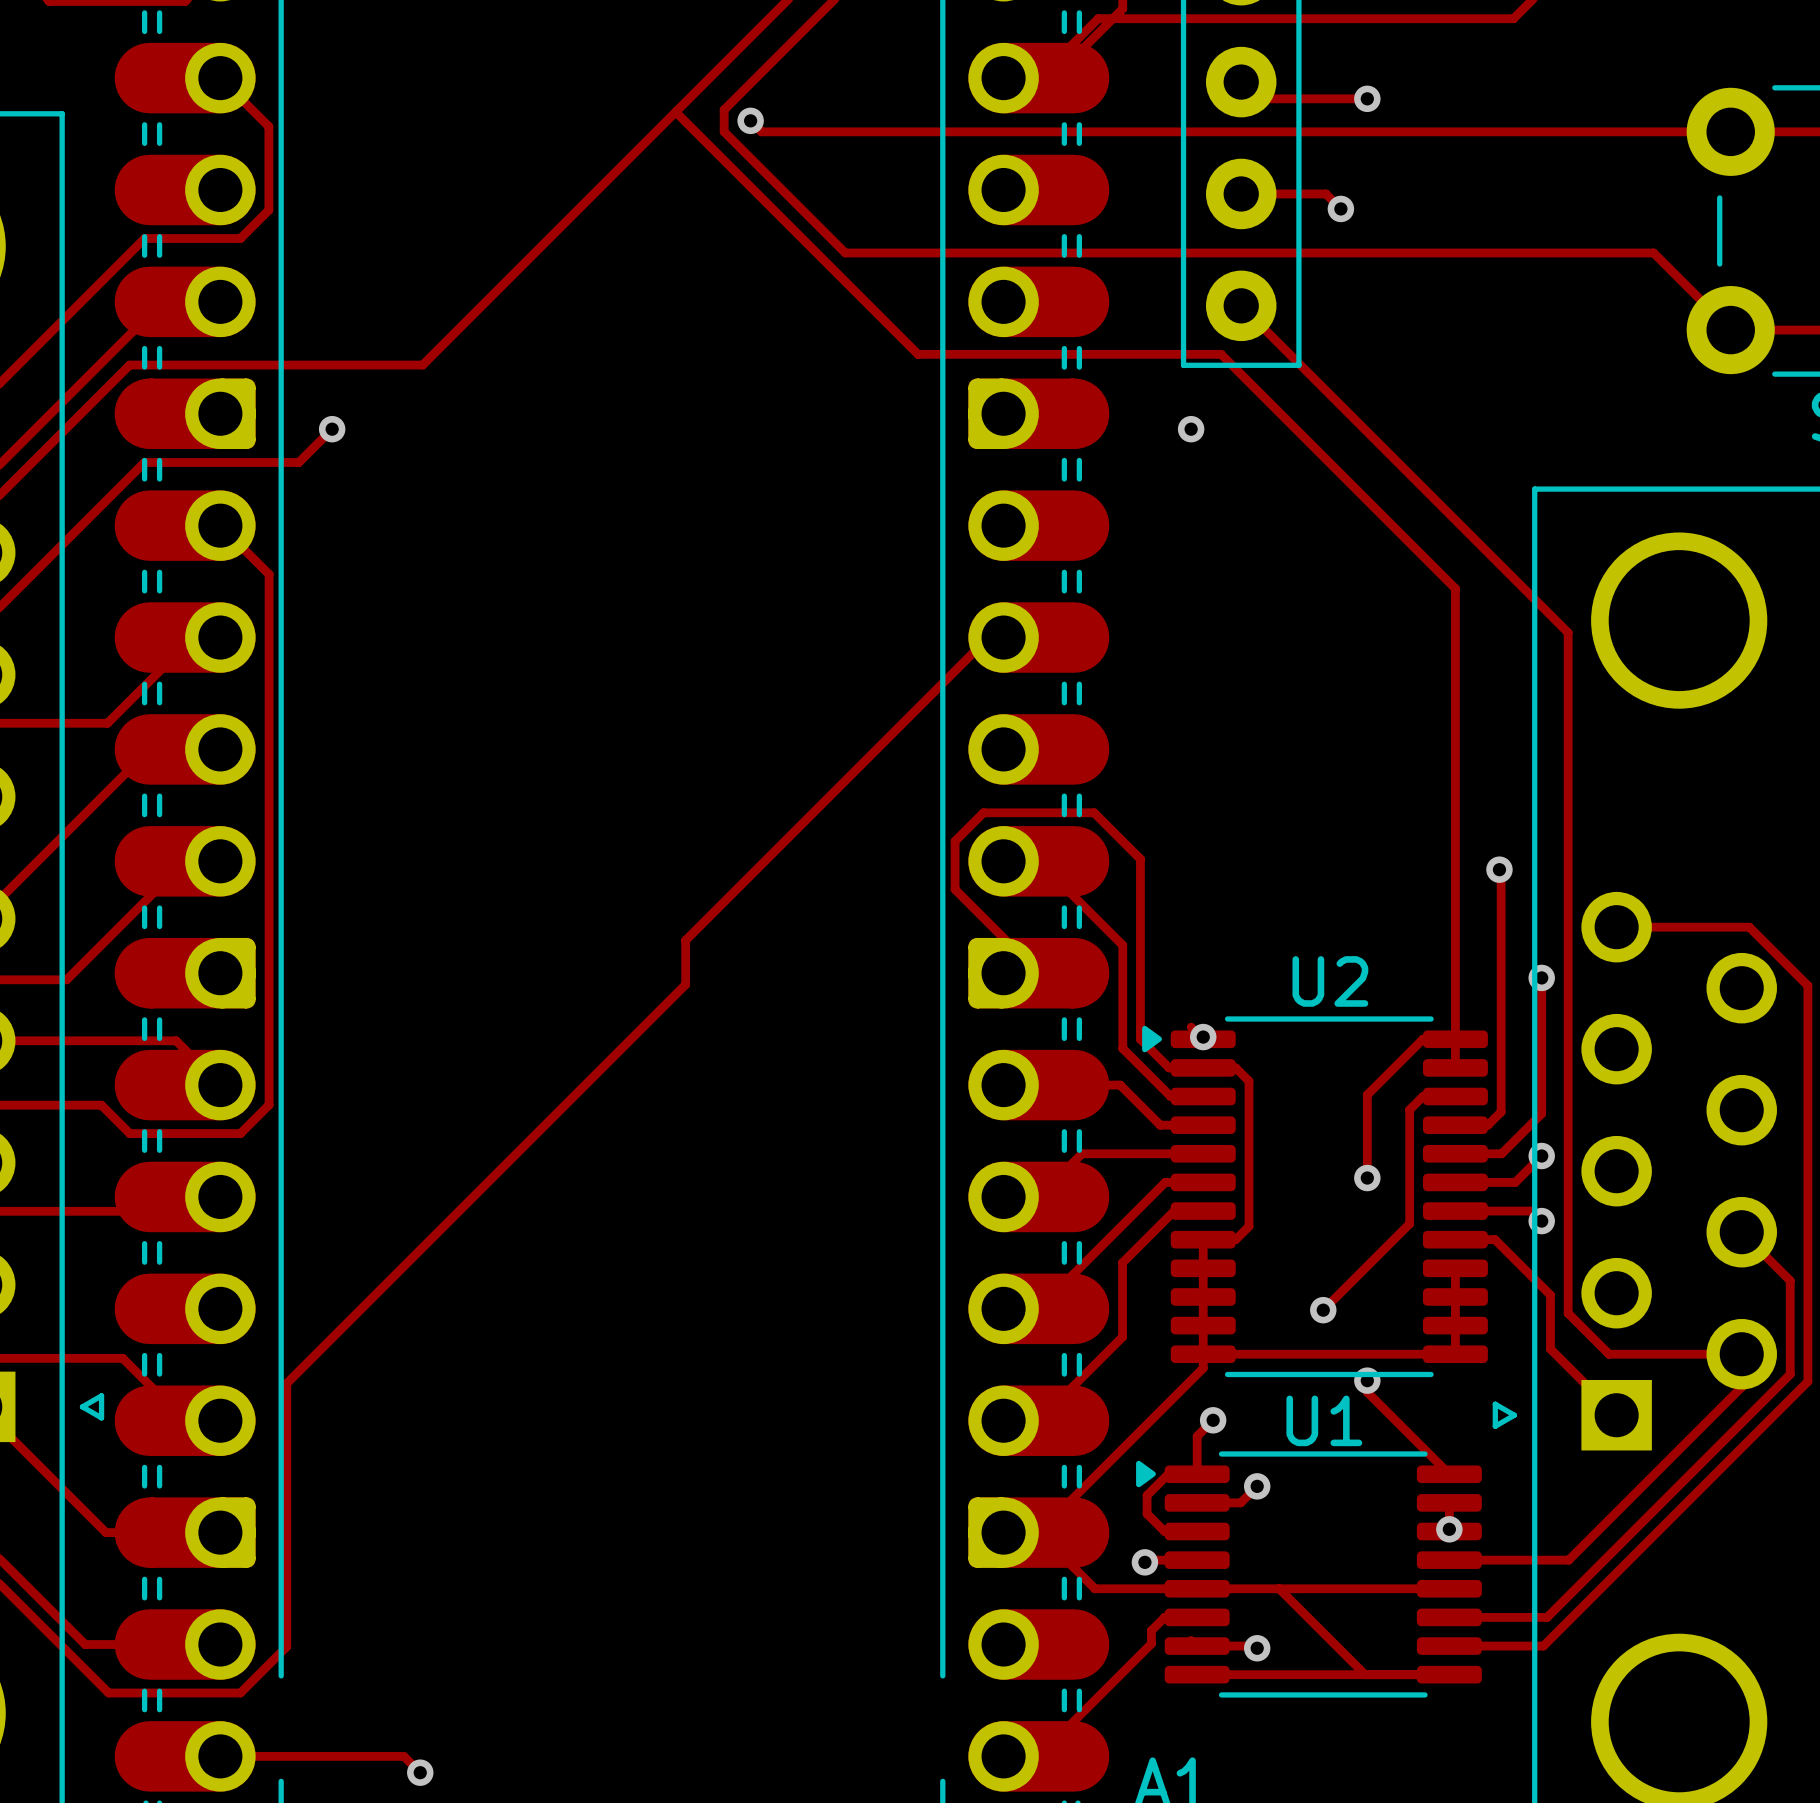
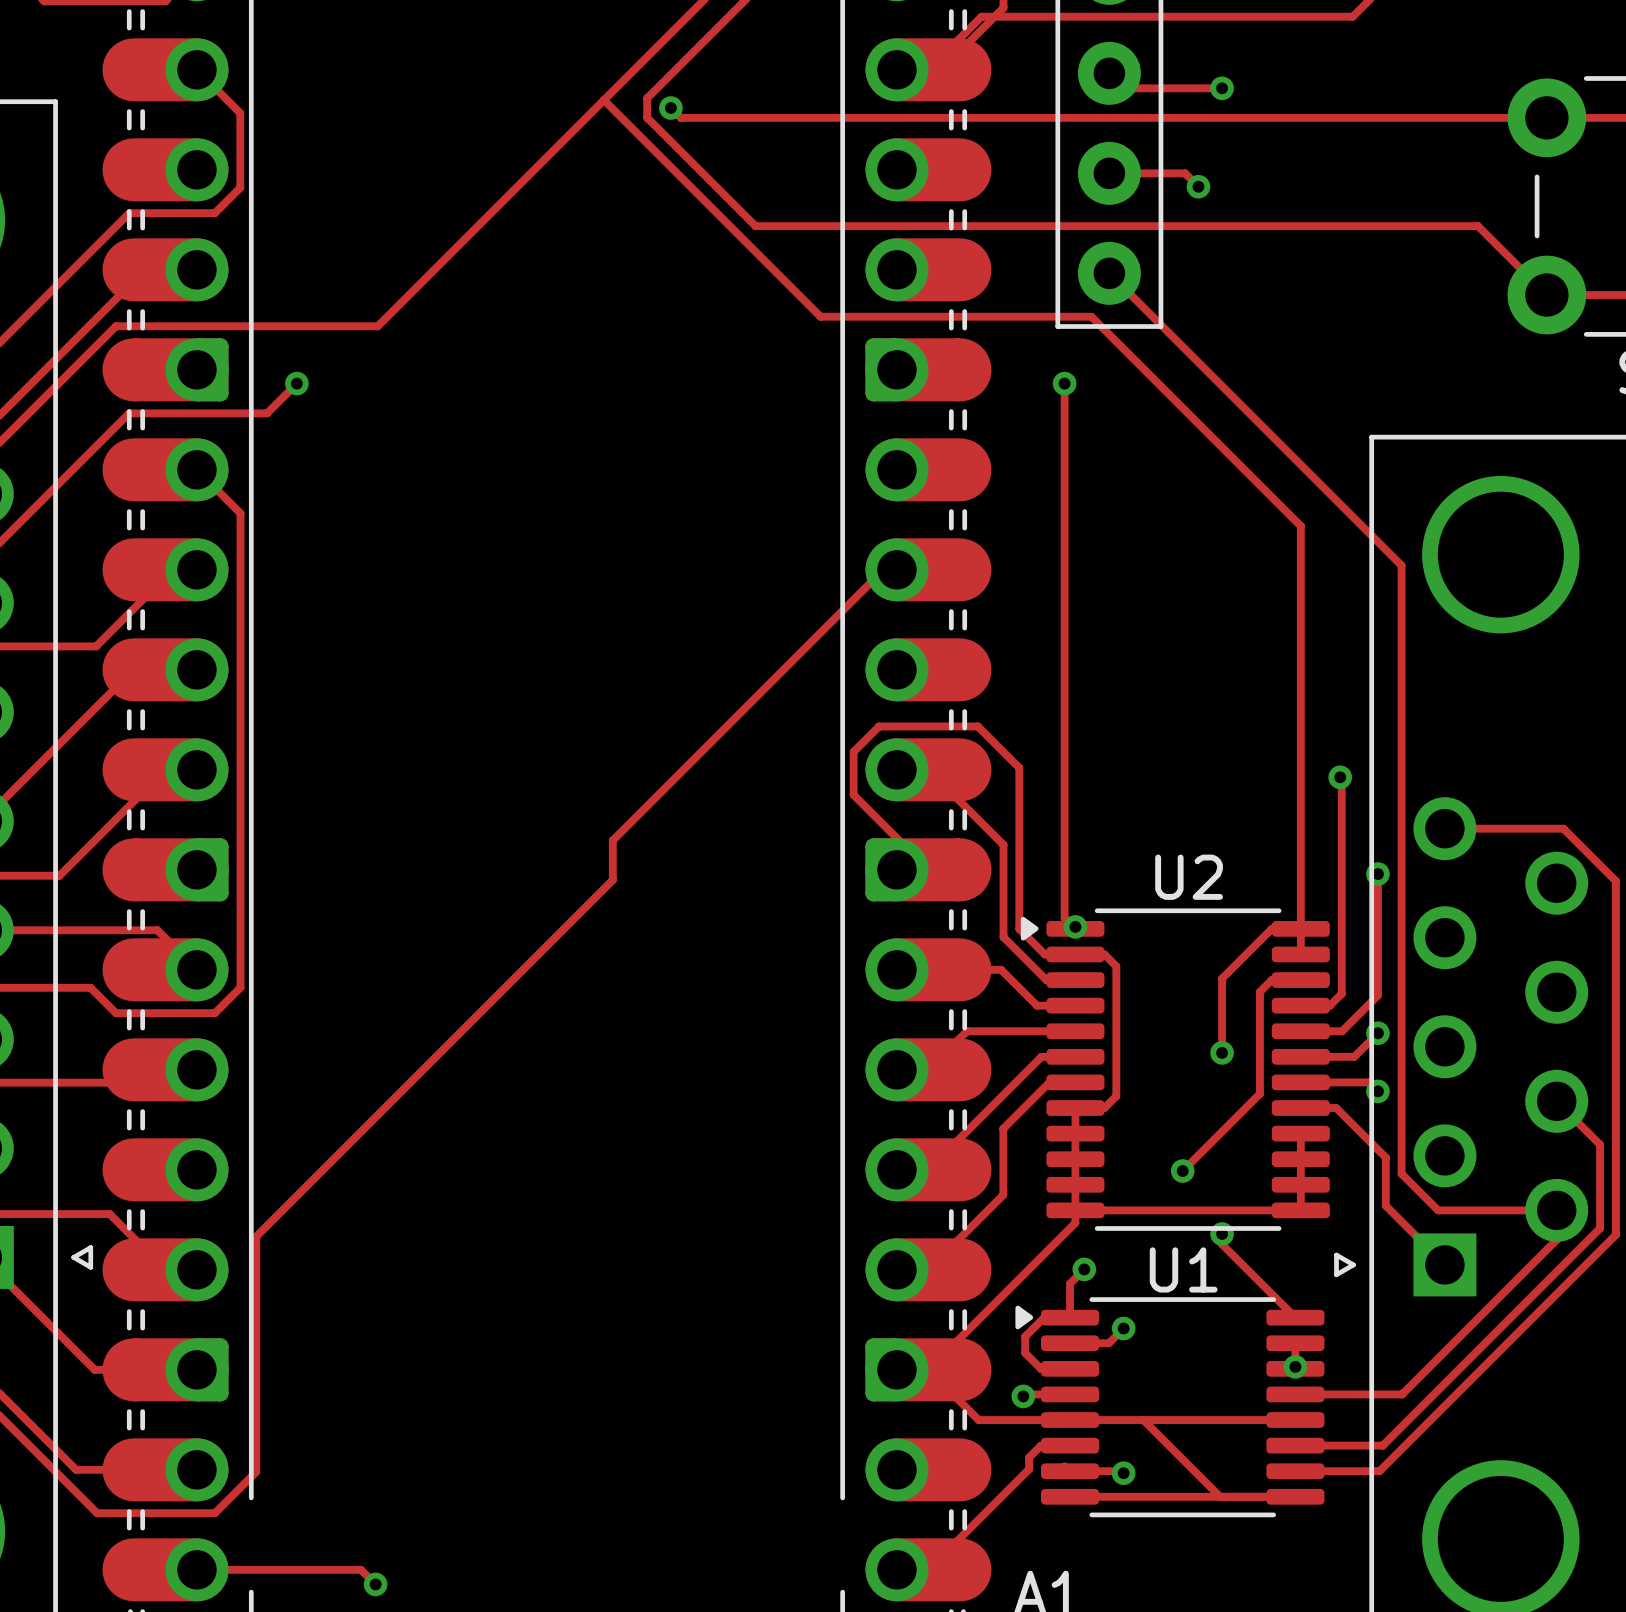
track: none -> (1064, 383) (1064, 918)

